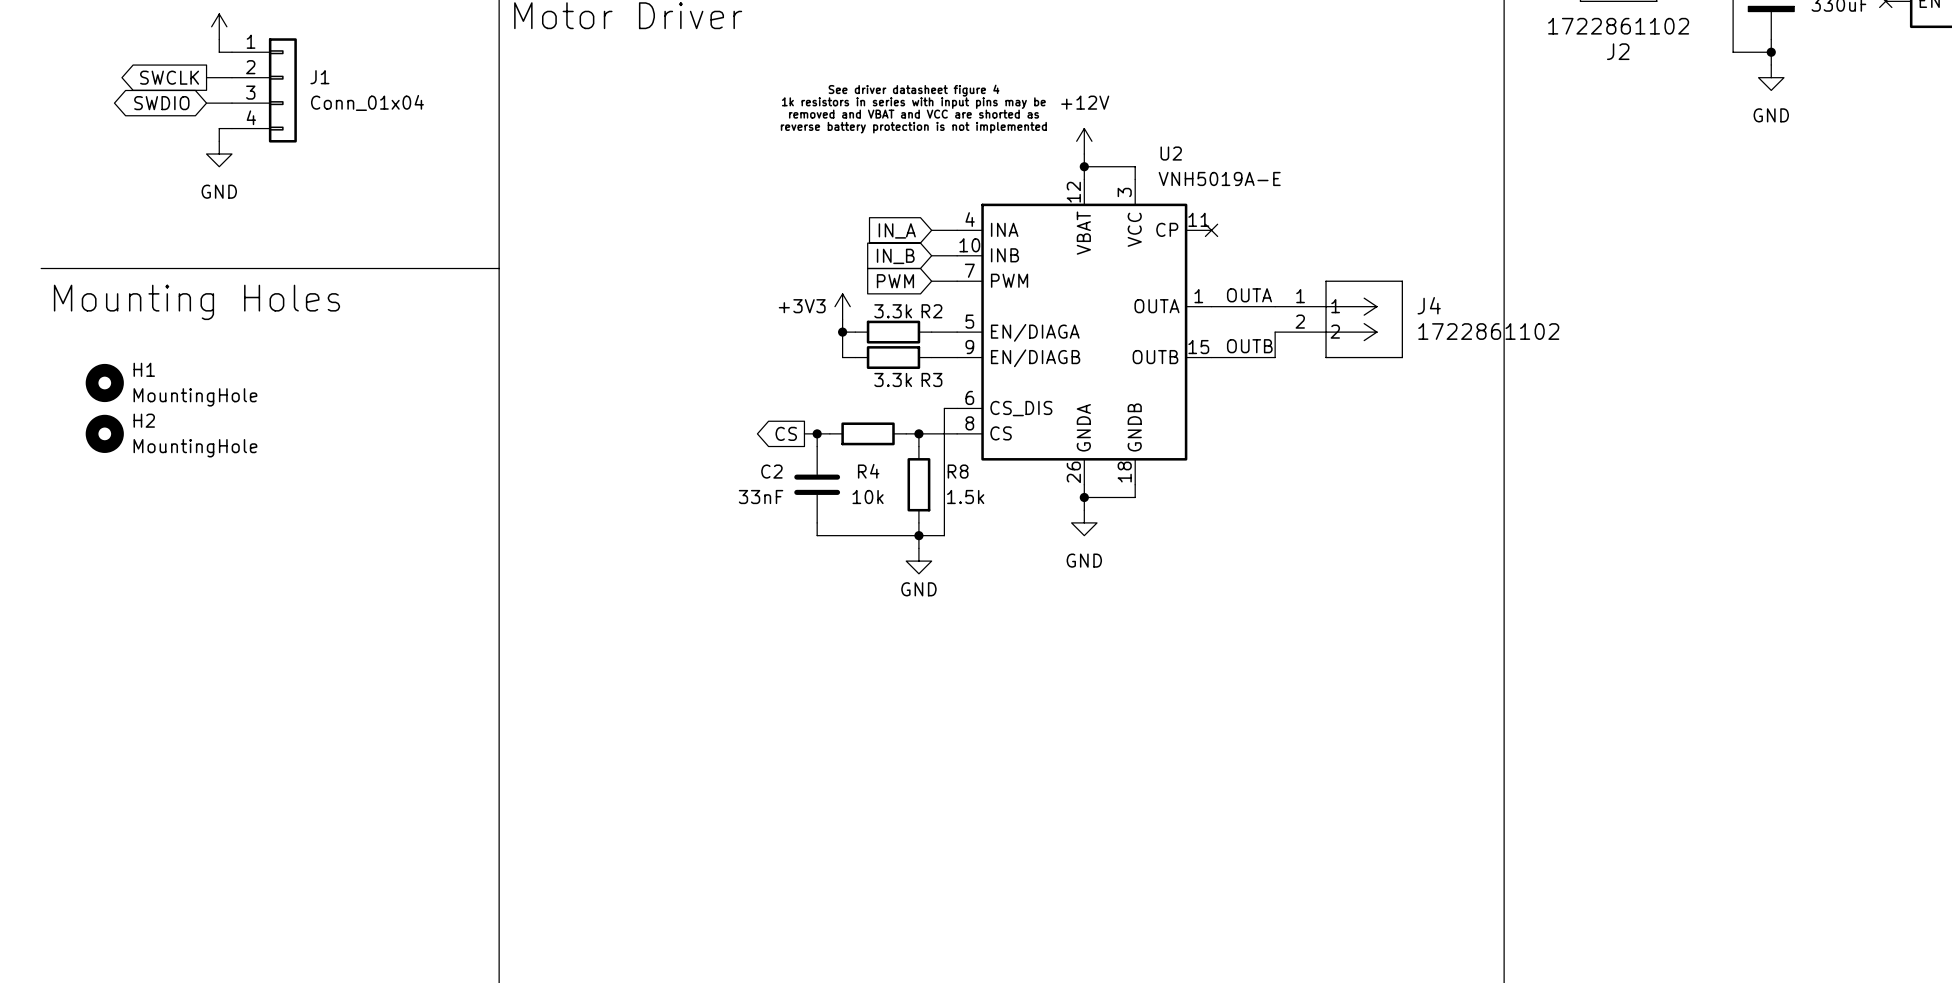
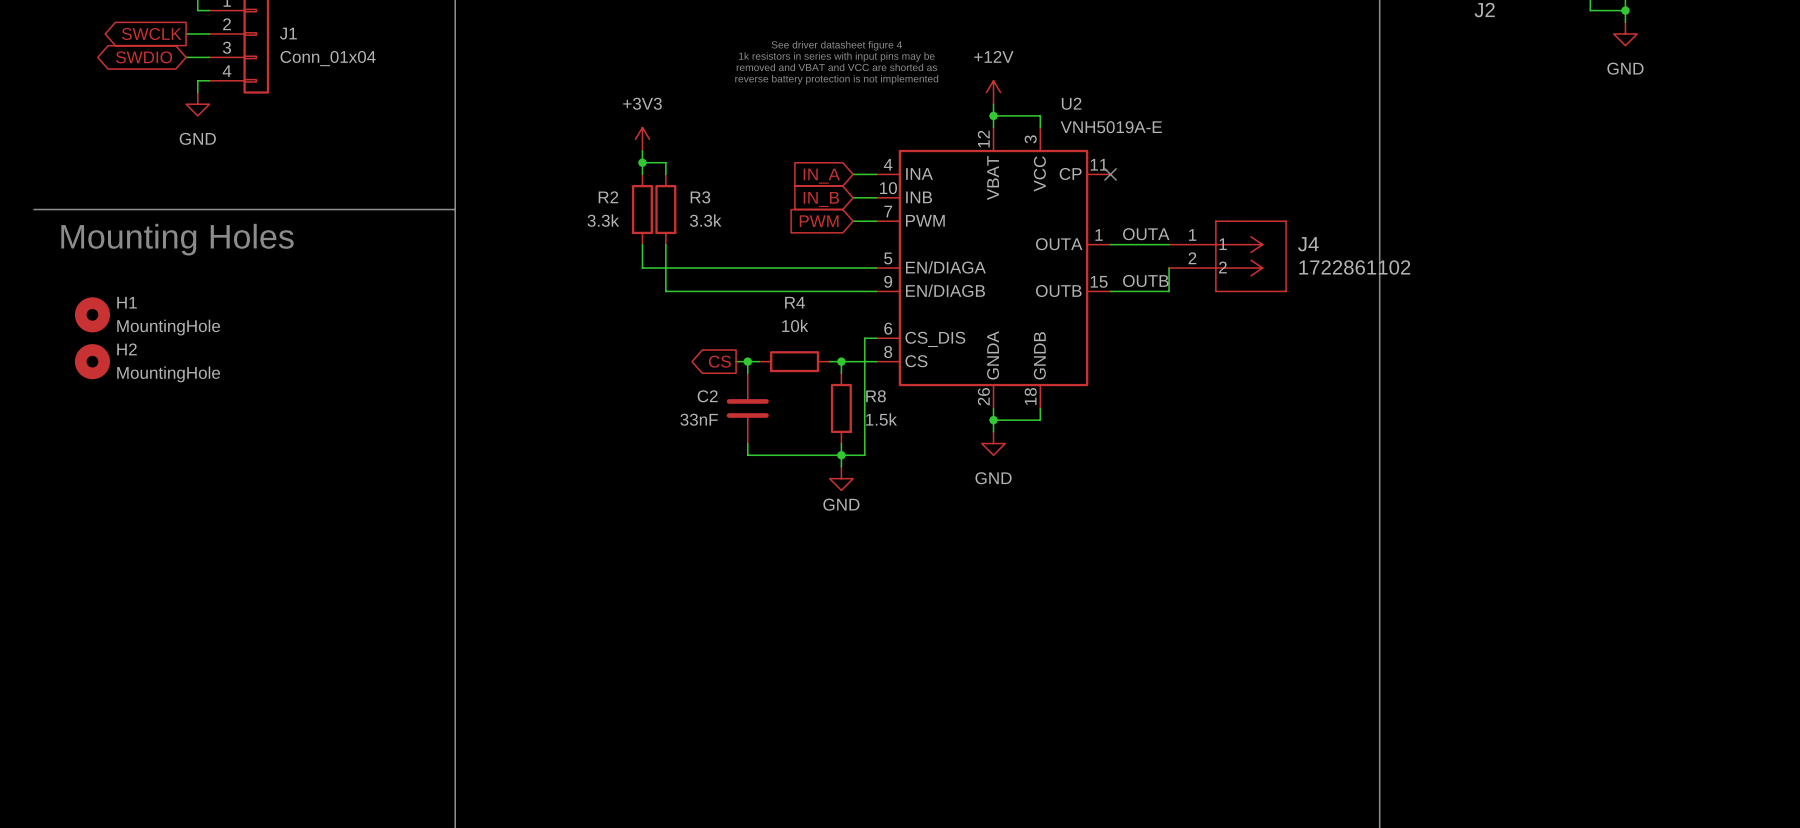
wire: none -> (642, 151) (642, 174)
wire: none -> (642, 162) (665, 162) (665, 174)
junction: none -> (642, 162)
wire: none -> (642, 244) (642, 268) (771, 268)
power symbol text position: +3V3 (802, 306) -> +3V3 (642, 103)
power symbol position: +3V3 (842, 306) -> +3V3 (642, 139)
R2 value position: 3.3k (893, 311) -> 3.3k (603, 220)
R2 name position: R2 (931, 311) -> R2 (608, 197)
wire: (842, 319) (842, 357) -> (665, 244) (665, 291) (771, 291)
junction: (842, 332) -> none
wire: none -> (782, 268) (853, 268)
R2 rotation: 0° (893, 332) -> 90° clockwise (642, 209)
R2 position: (893, 332) -> (642, 209)
wire: none -> (782, 291) (853, 291)
R3 rotation: 0° (893, 357) -> 90° clockwise (665, 209)
R3 position: (893, 357) -> (665, 209)
R3 value position: 3.3k (893, 379) -> 3.3k (705, 220)
R3 name position: R3 (931, 379) -> R3 (700, 197)
R4 name position: R4 (868, 471) -> R4 (795, 302)
R4 value position: 10k (868, 497) -> 10k (795, 325)

